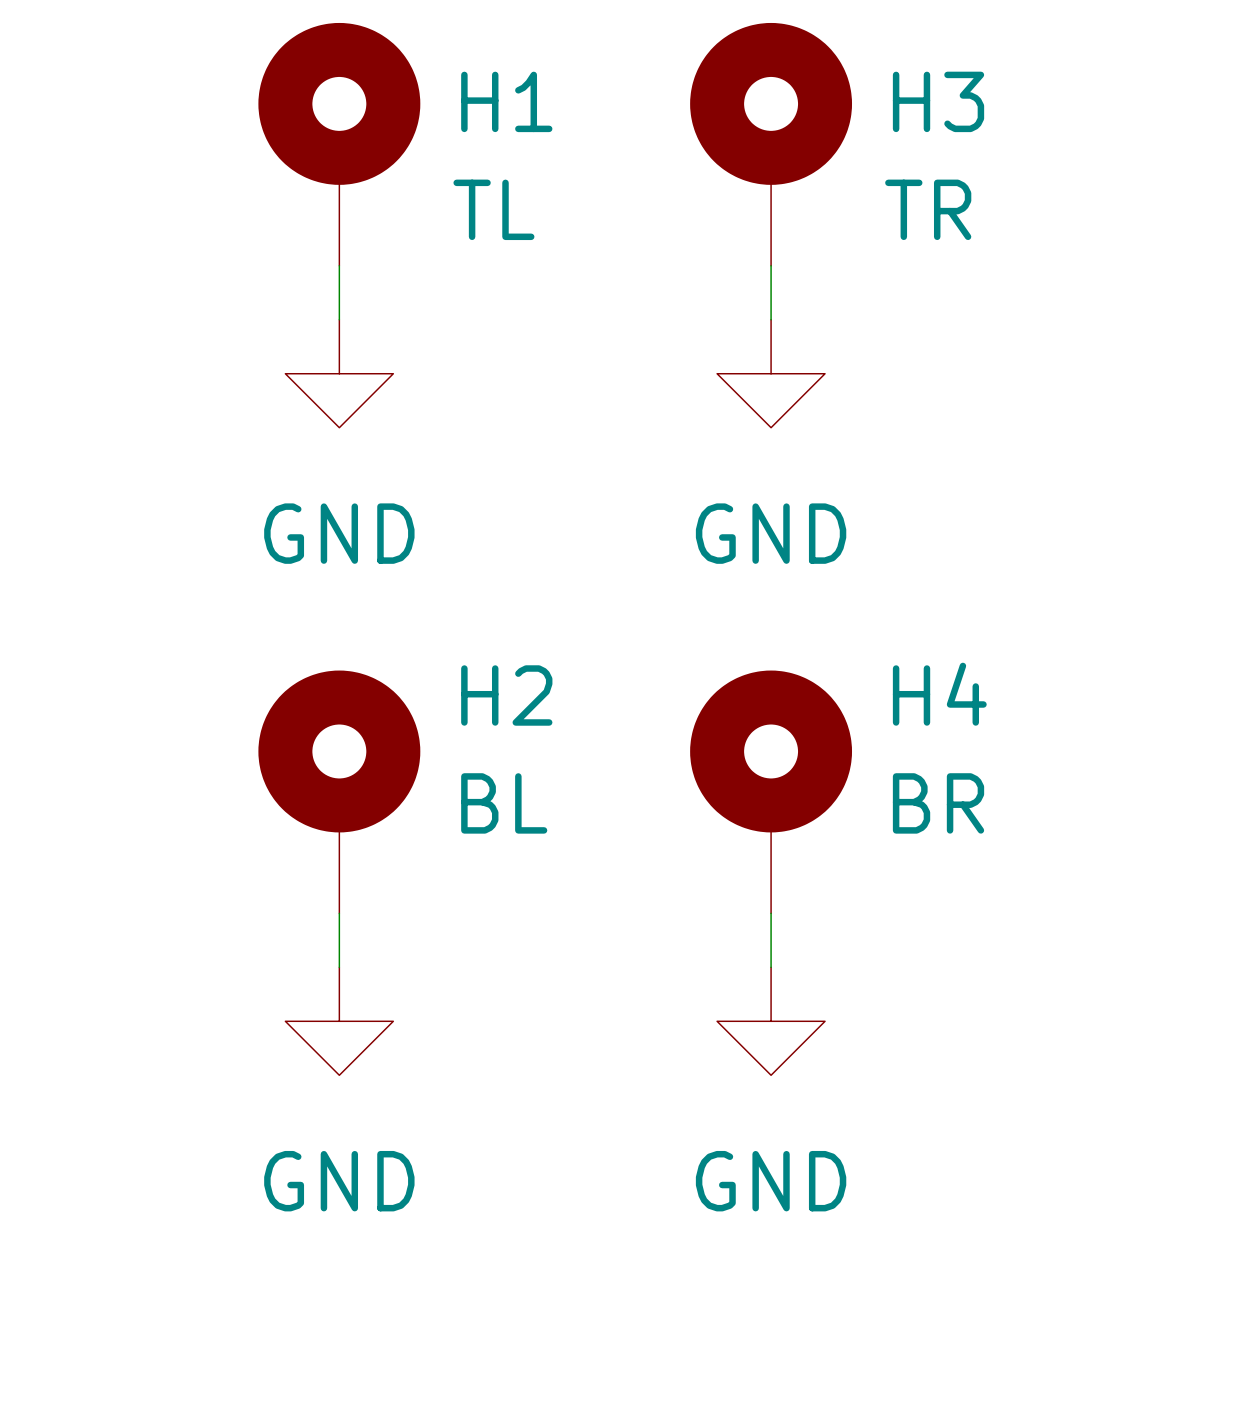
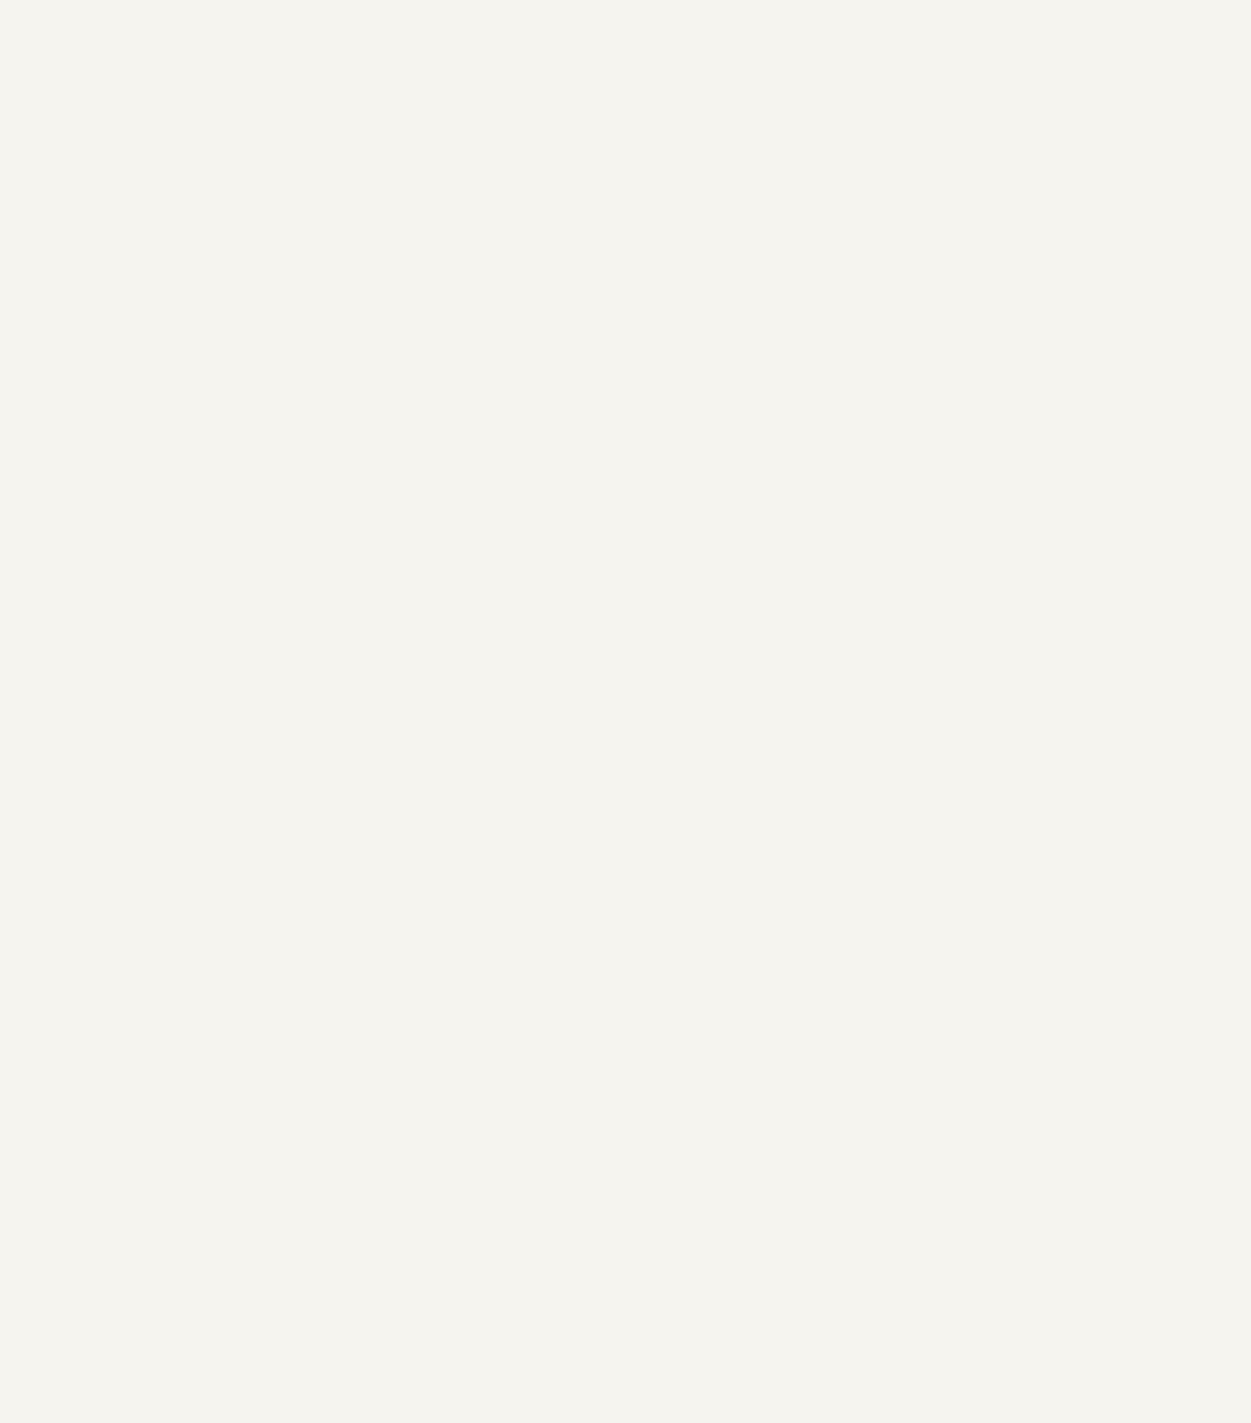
H1: TL (339, 144) -> none
H3: TR (771, 144) -> none
wire: (339, 265) (339, 319) -> none
wire: (771, 265) (771, 319) -> none
power symbol: GND (339, 373) -> none
power symbol: GND (771, 373) -> none
H2: BL (339, 791) -> none
H4: BR (771, 791) -> none
wire: (339, 913) (339, 967) -> none
wire: (771, 913) (771, 967) -> none
power symbol: GND (339, 1021) -> none
power symbol: GND (771, 1021) -> none

